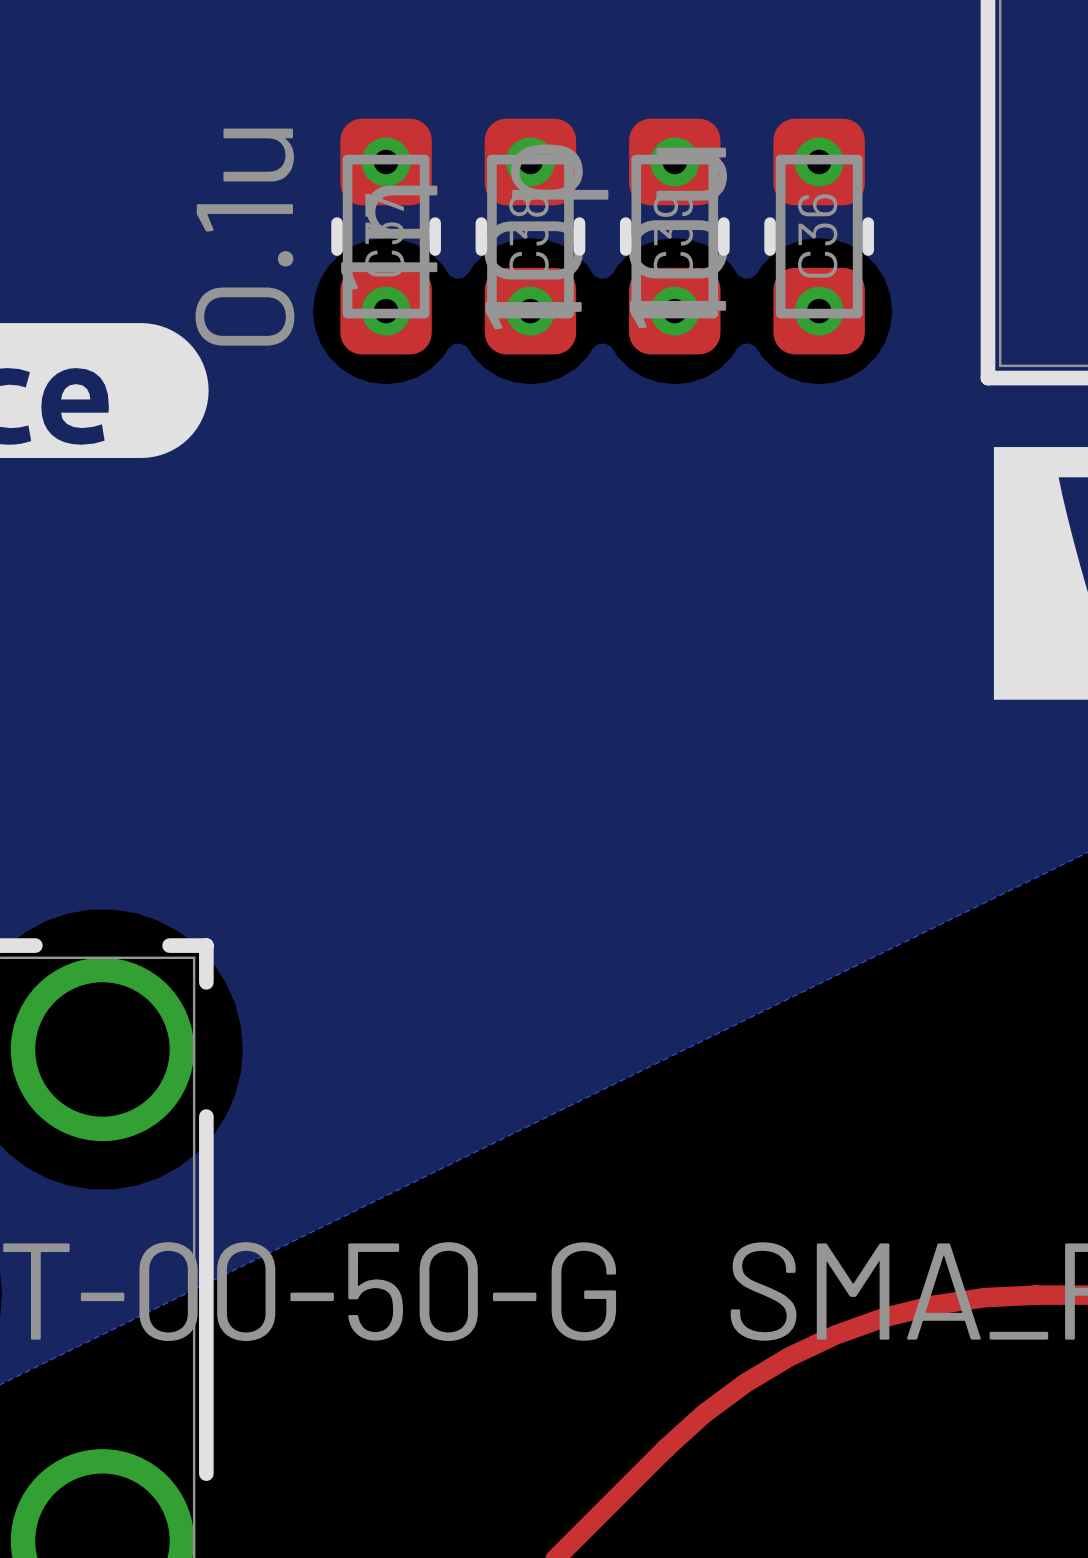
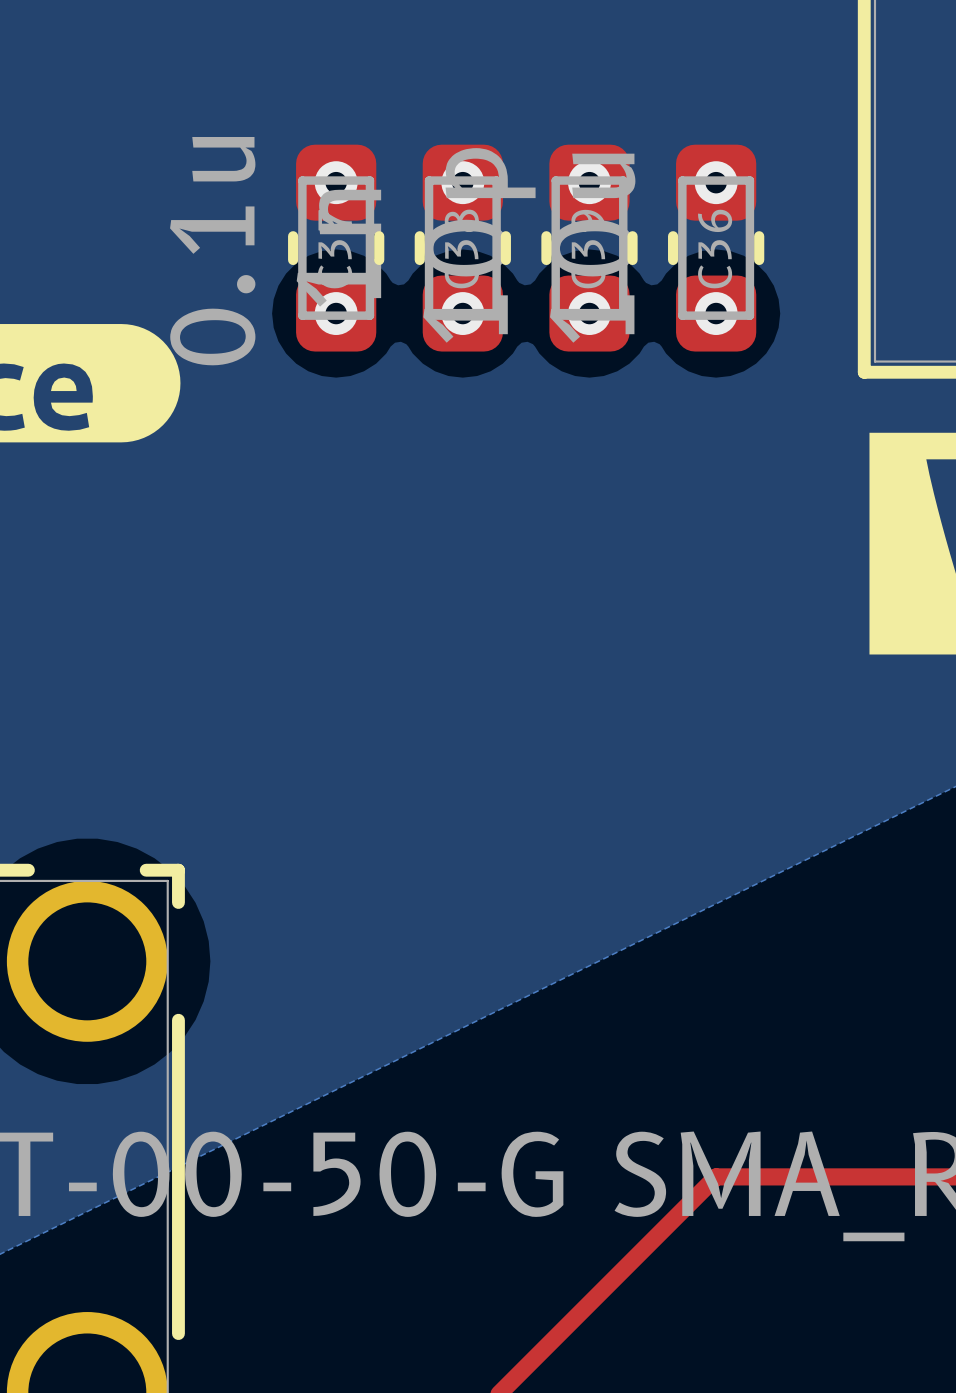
top track: (1036, 1295) (984, 1297) (933, 1305) (884, 1317) (835, 1334) (789, 1356) (745, 1383) (703, 1413) (665, 1448) -> (906, 1176) (716, 1176) (581, 1311)

